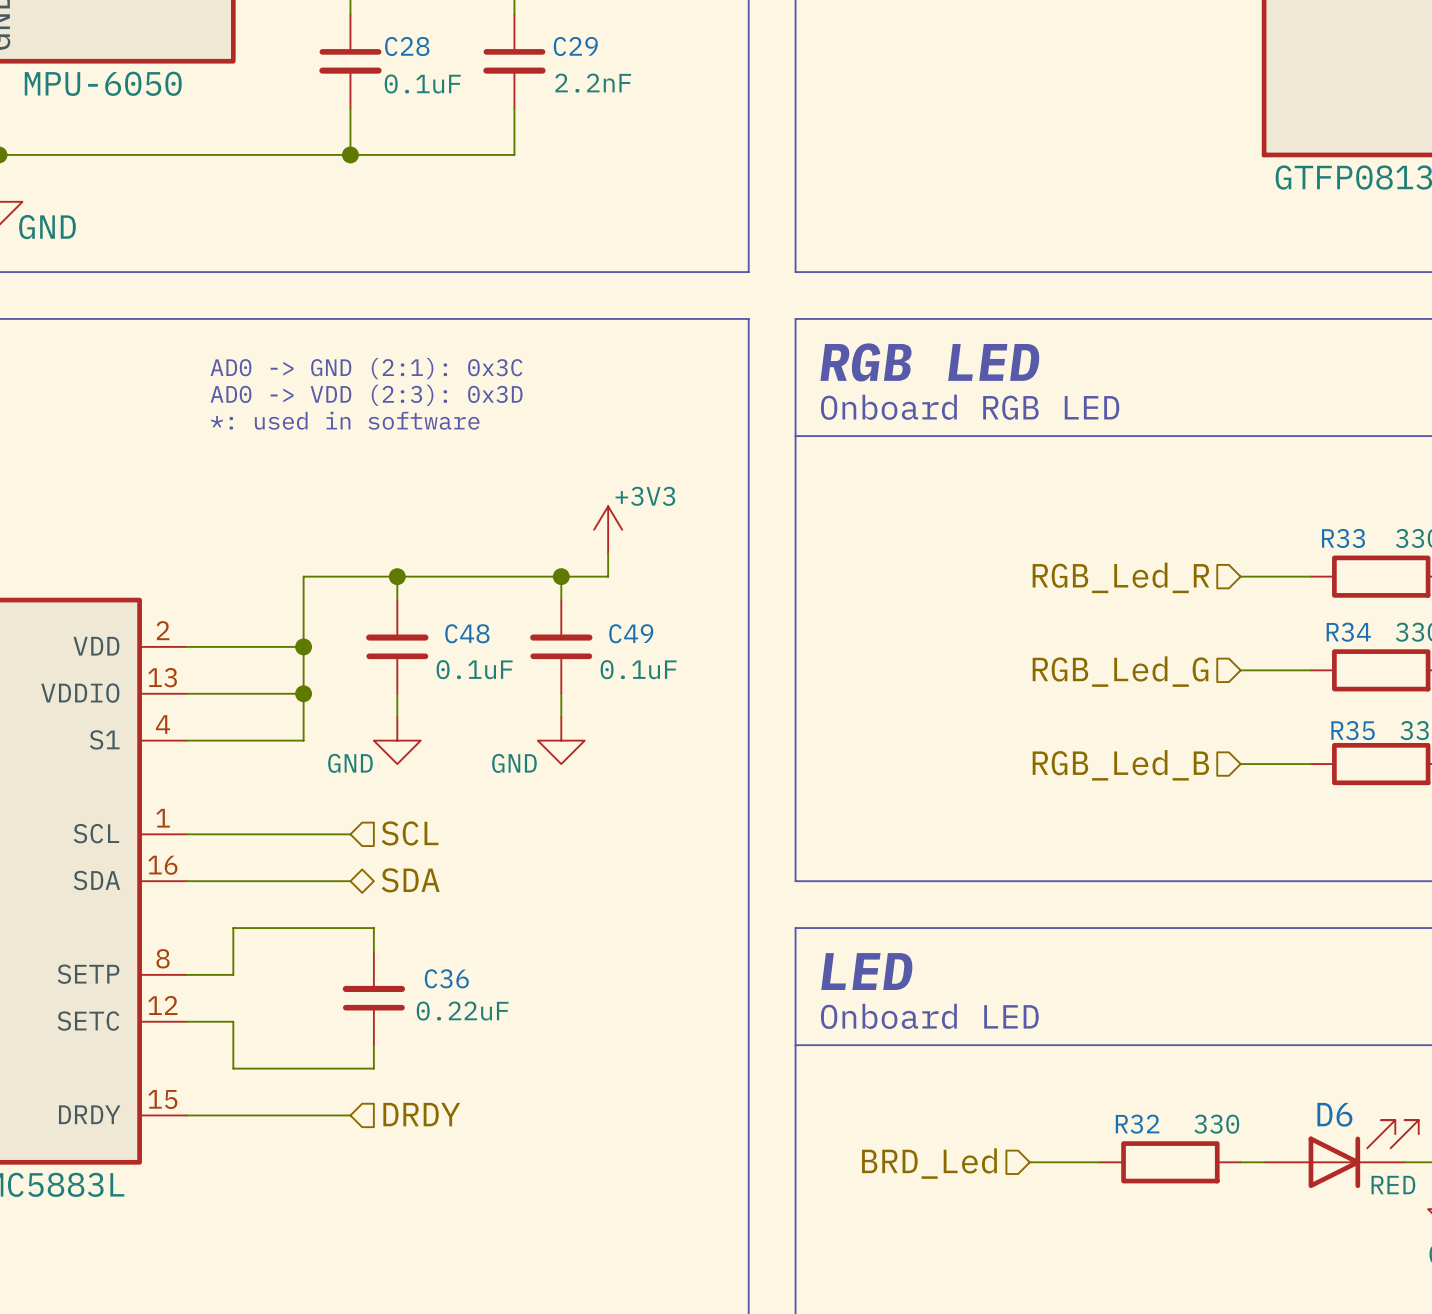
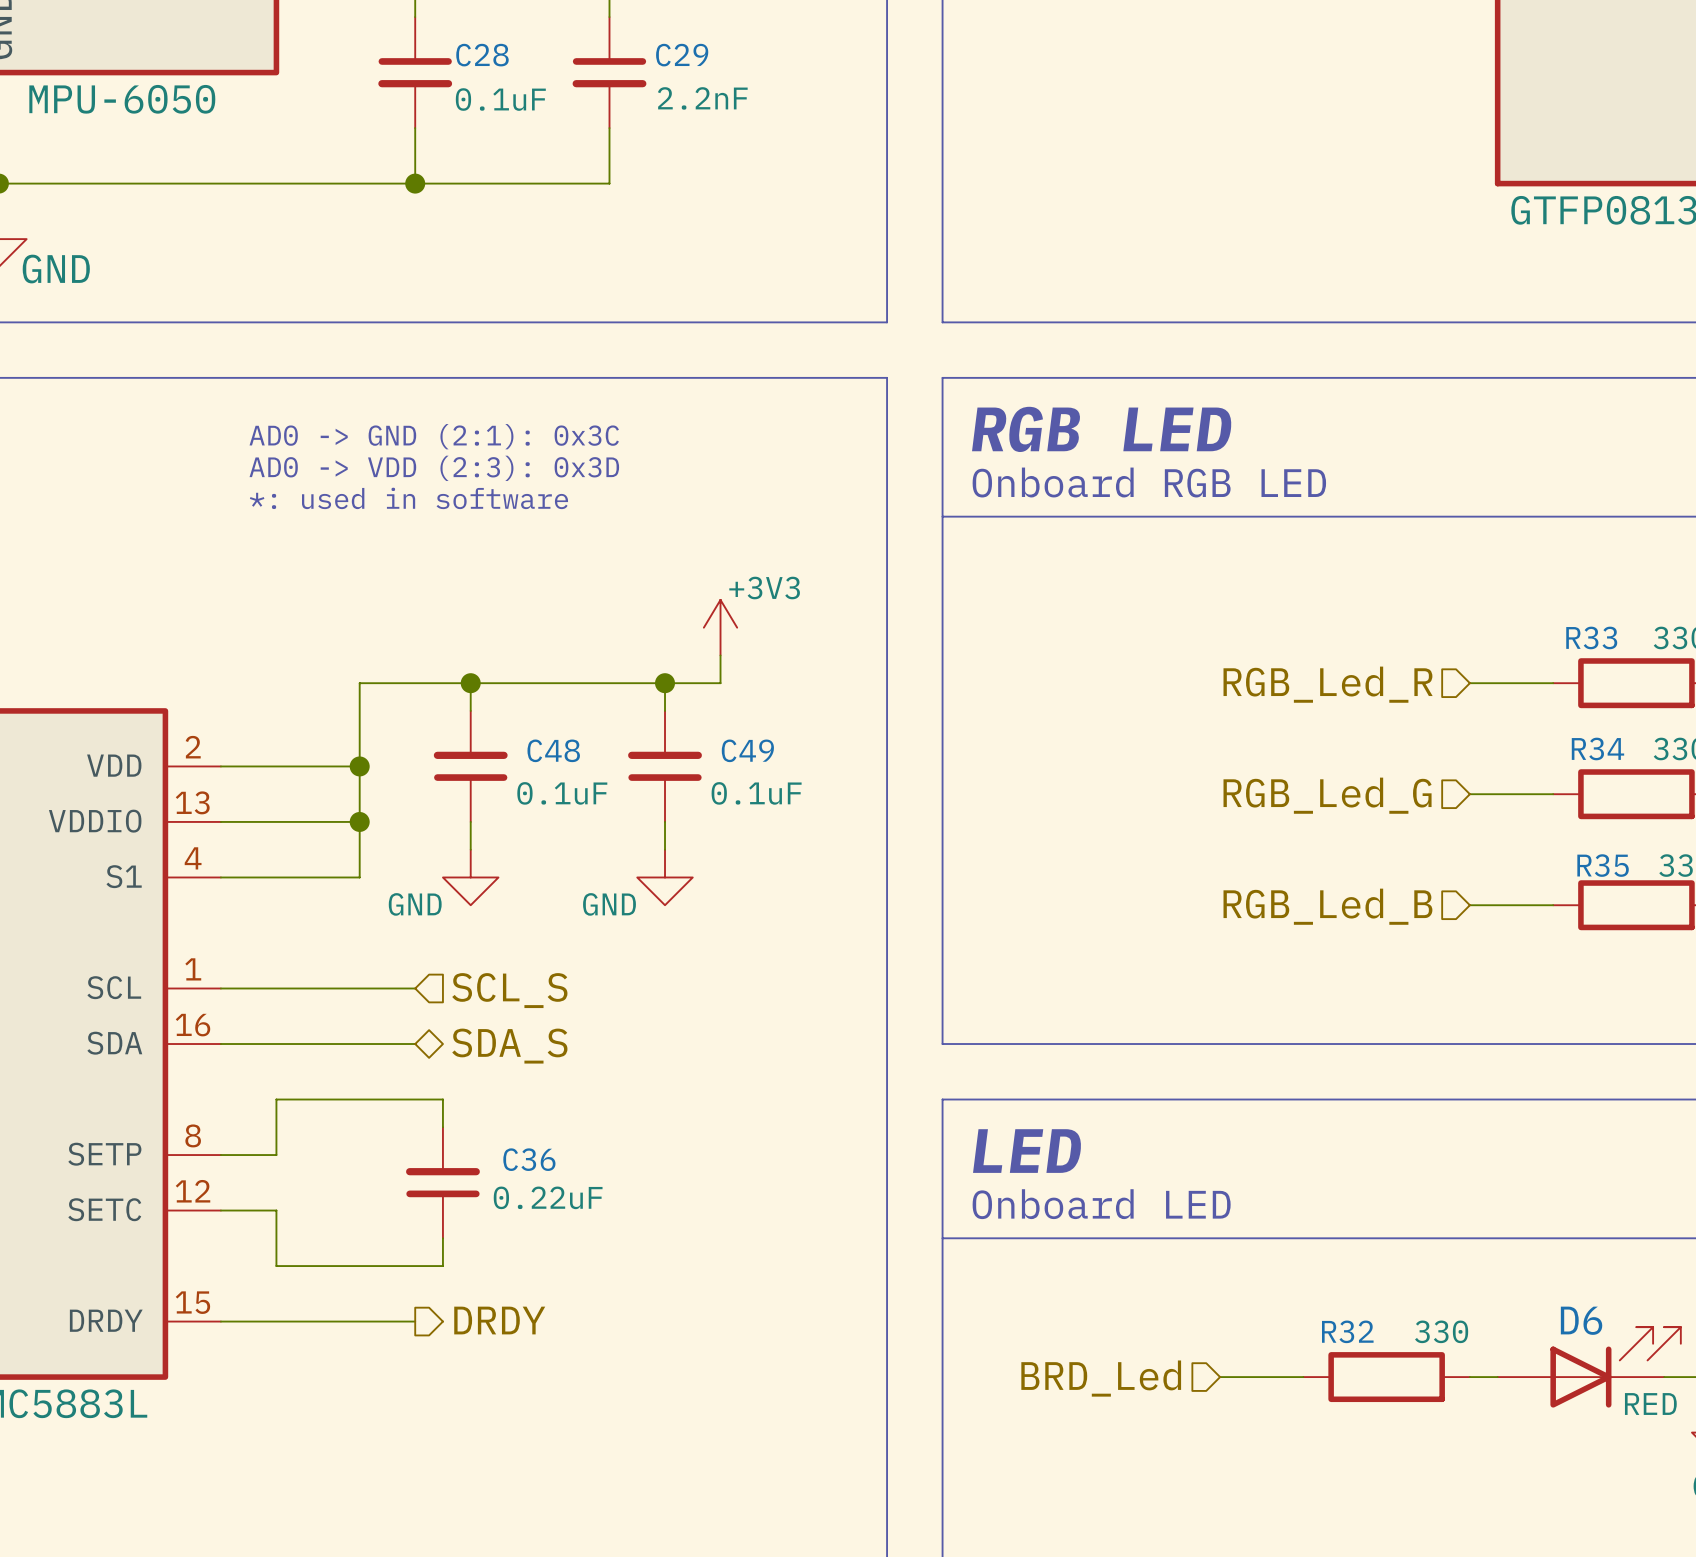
hierarchical label: SCL (410, 833) -> SCL_S (509, 990)
hierarchical label: SDA (410, 880) -> SDA_S (509, 1046)
hierarchical label shape: input (421, 1114) -> output (499, 1320)

